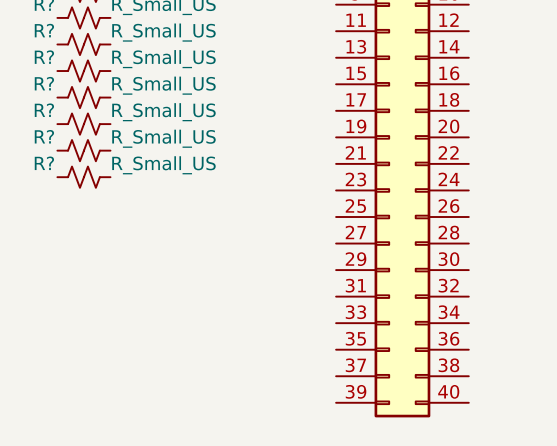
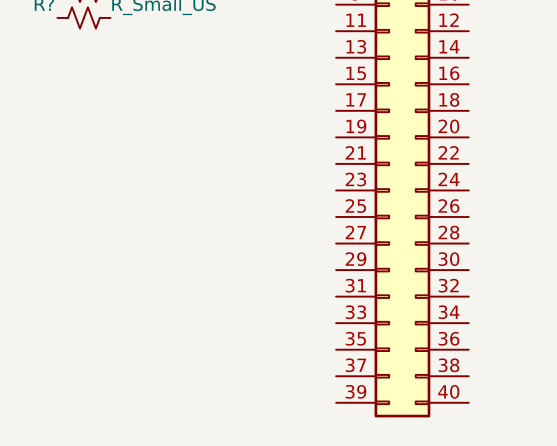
R?: R_Small_US (83, 44) -> none
R?: R_Small_US (83, 71) -> none
R?: R_Small_US (83, 97) -> none
R?: R_Small_US (83, 124) -> none
R?: R_Small_US (83, 150) -> none
R?: R_Small_US (83, 177) -> none

